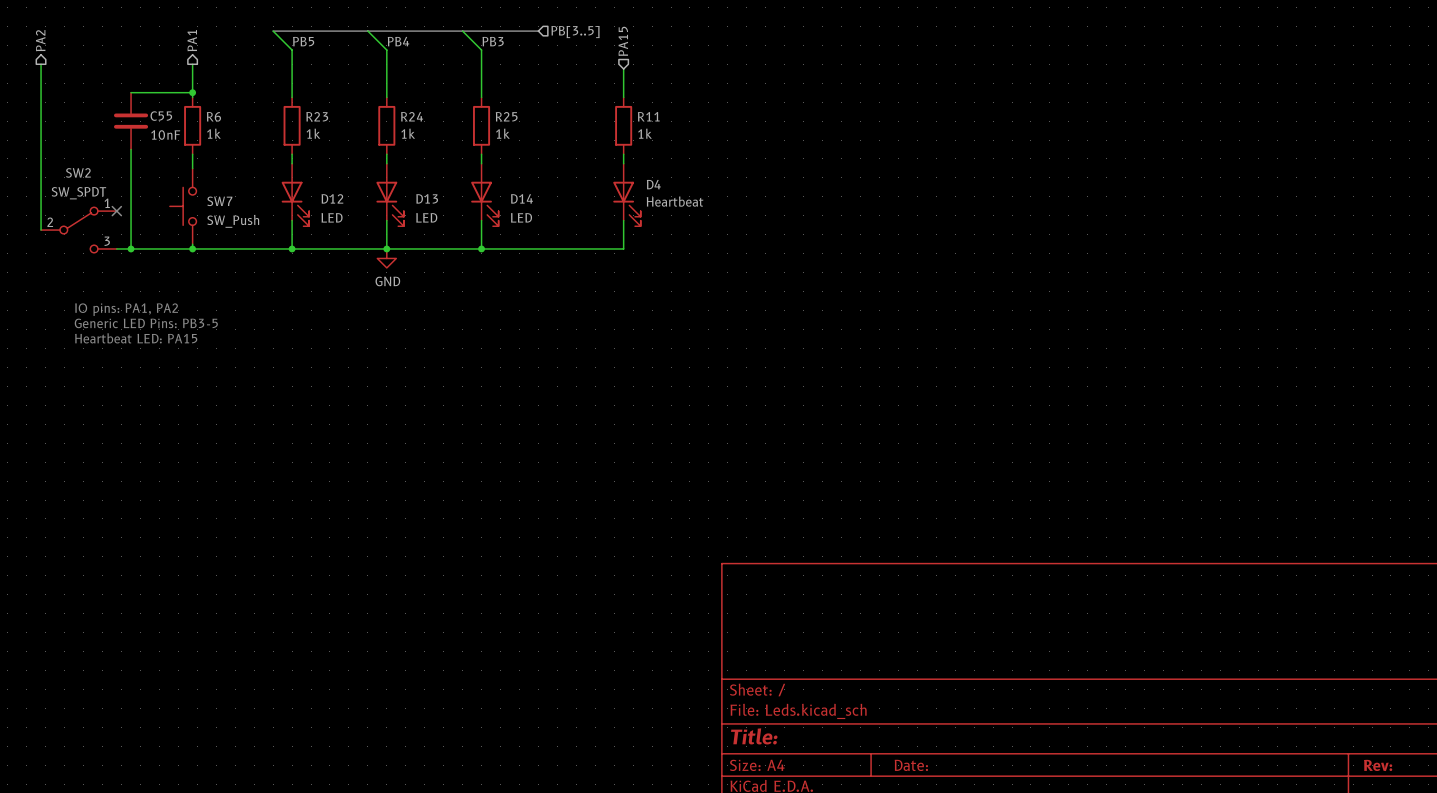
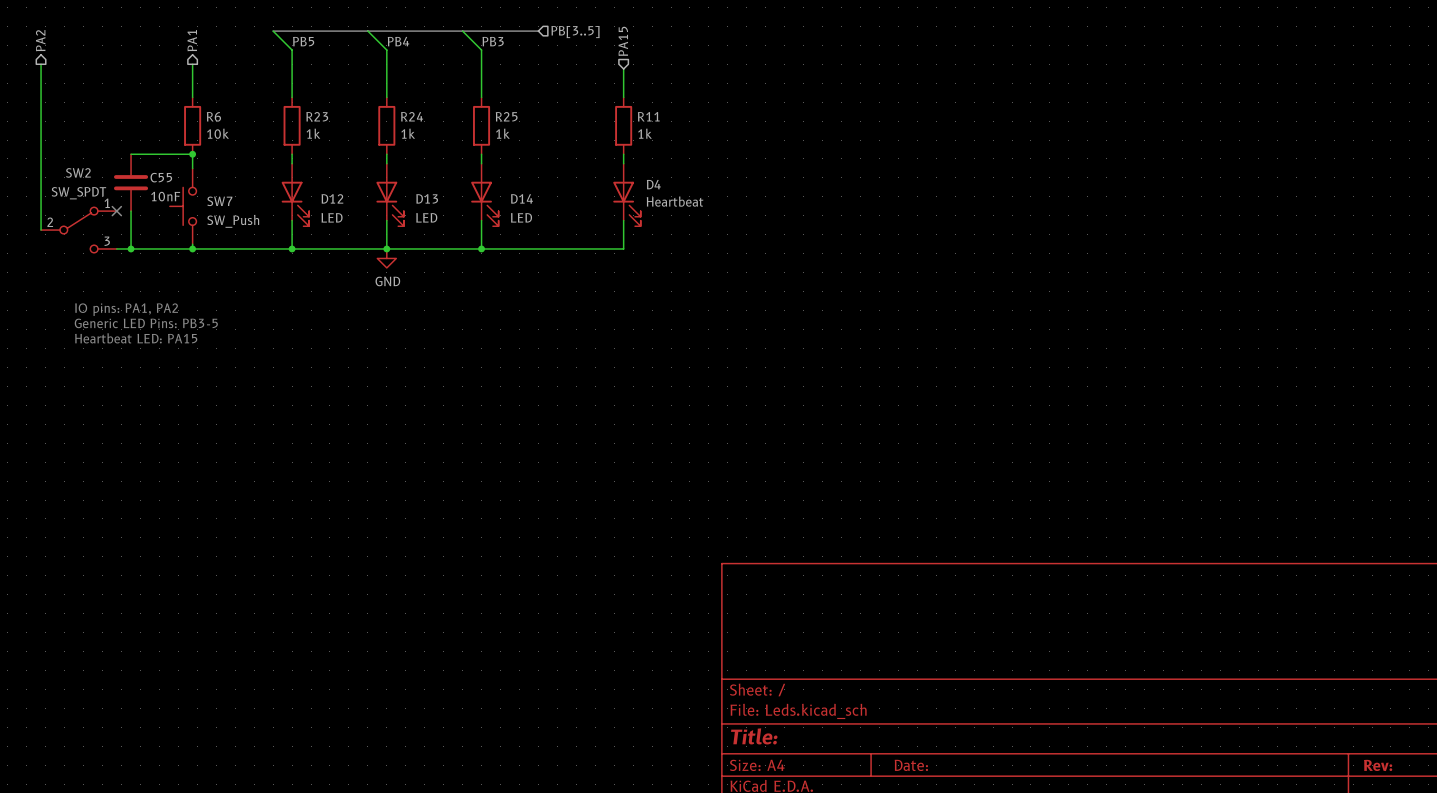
wire: (131, 92) (192, 92) -> (131, 154) (192, 154)
junction: (192, 92) -> none
C55 position: (131, 121) -> (131, 182)
R6 value: 1k (213, 133) -> 10k (218, 133)
junction: none -> (192, 154)

